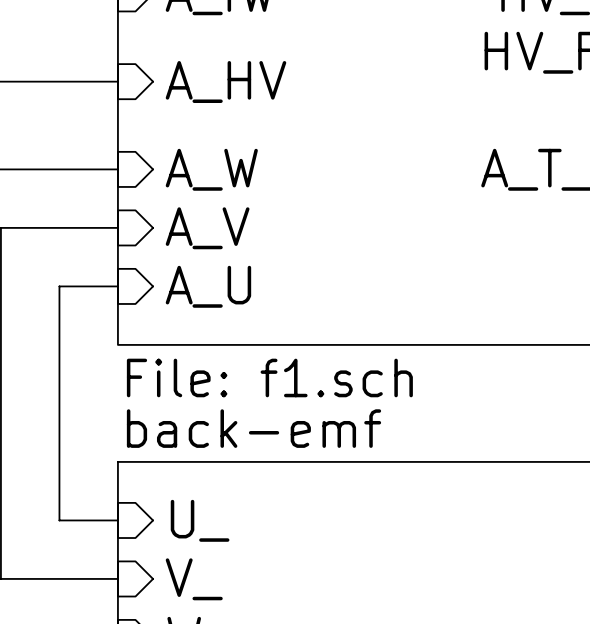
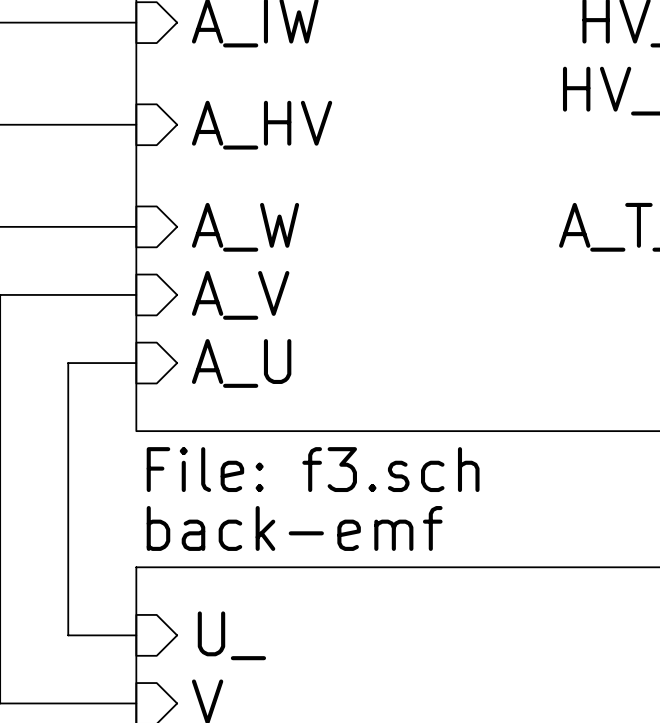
sheet value: File: f1.sch (269, 377) -> File: f3.sch (313, 469)

